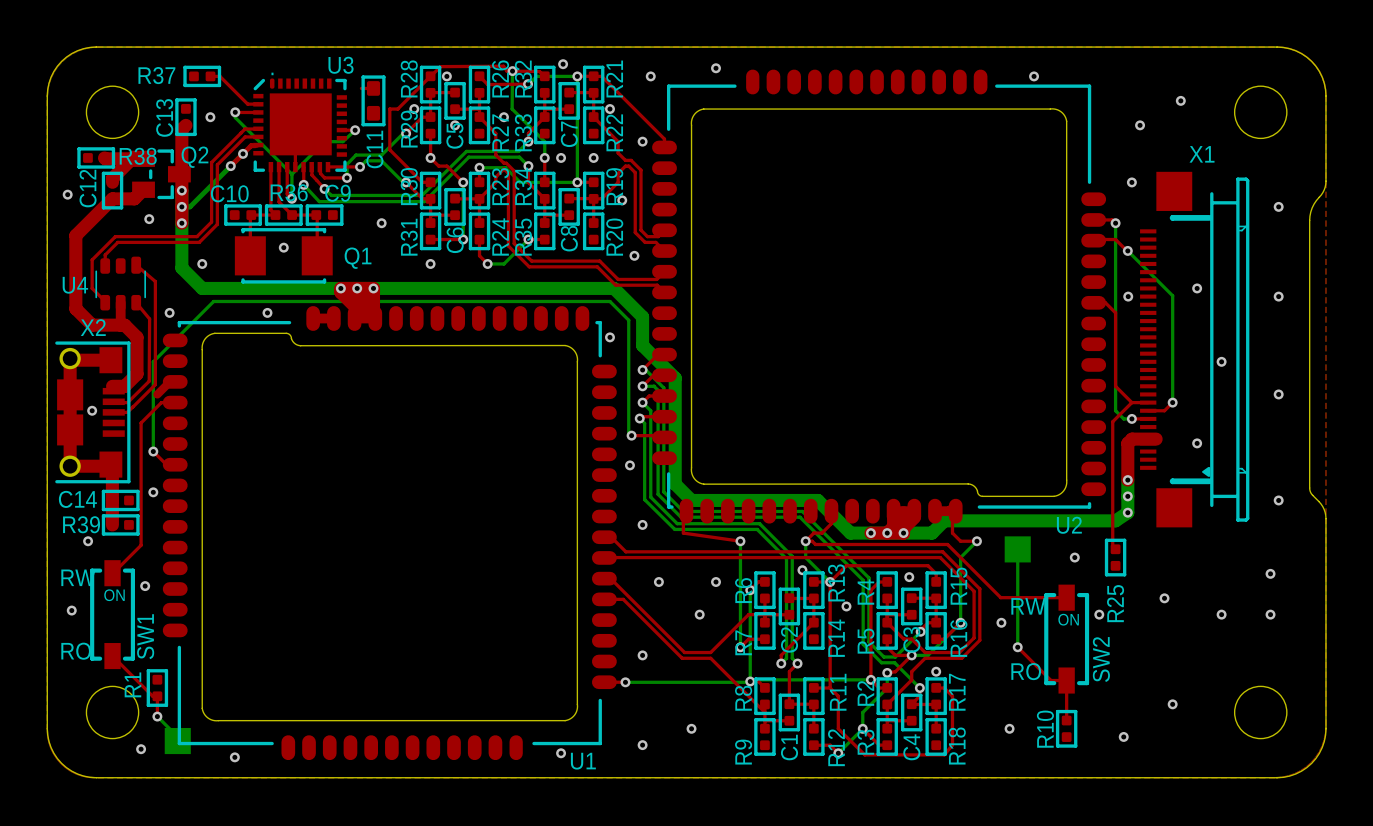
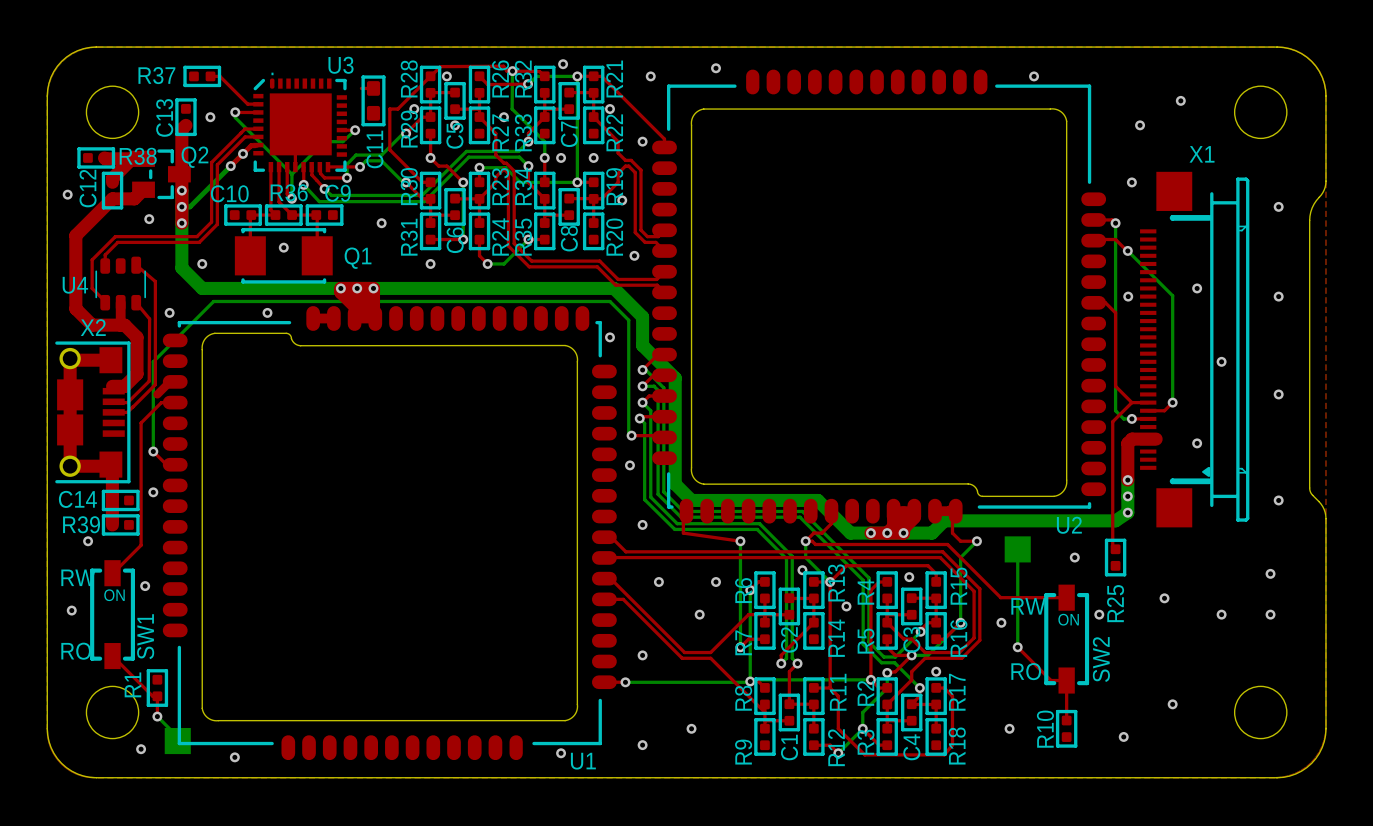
via: (92, 410) -> none

